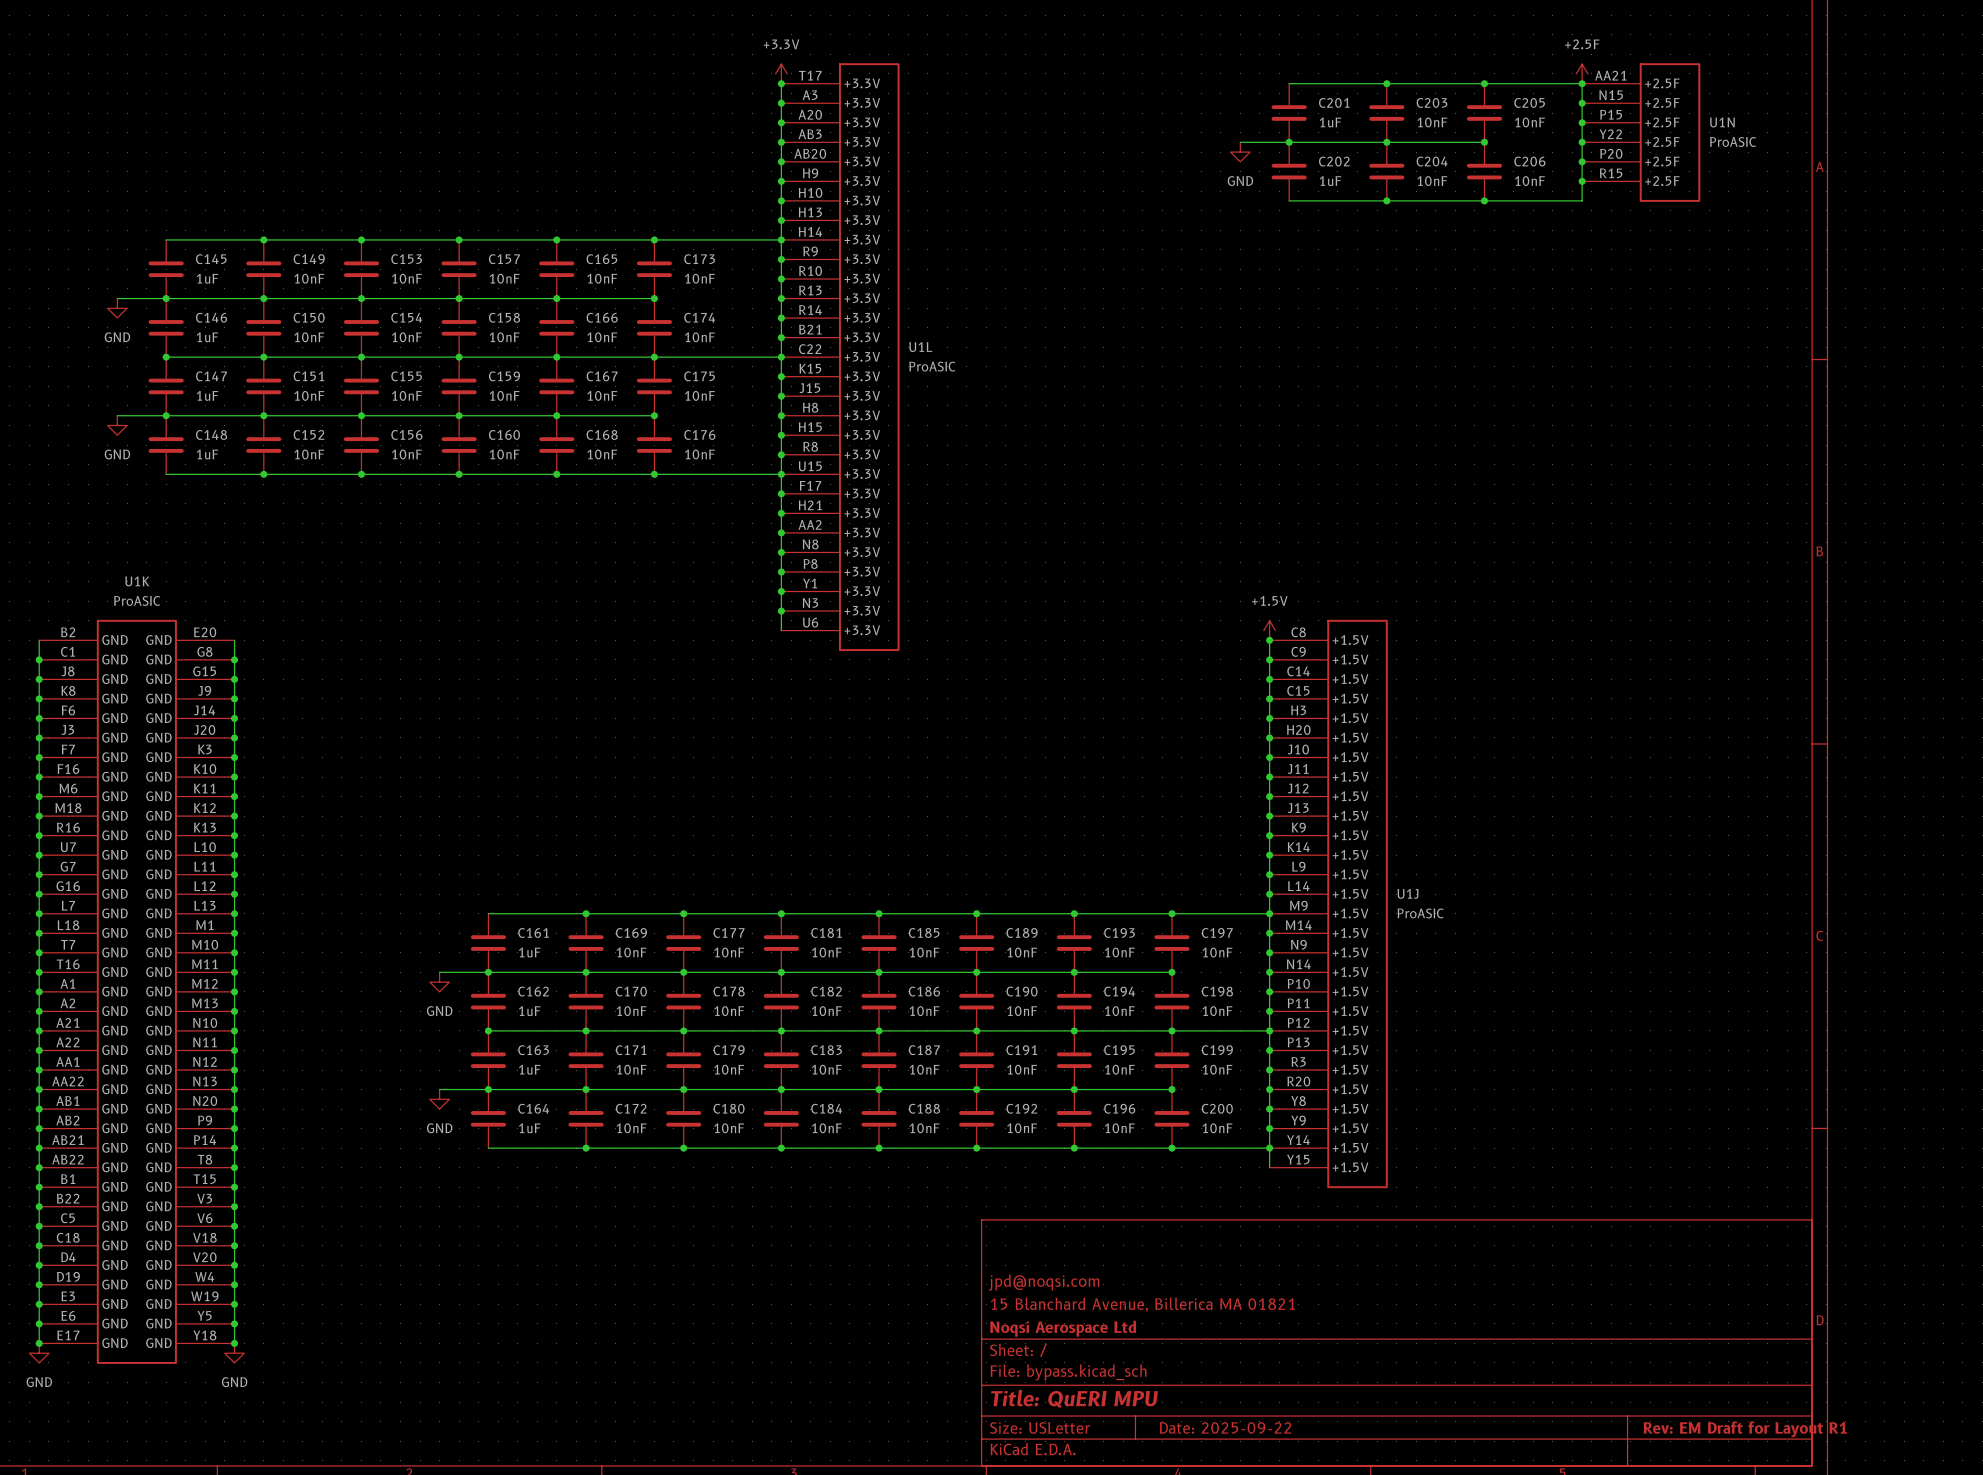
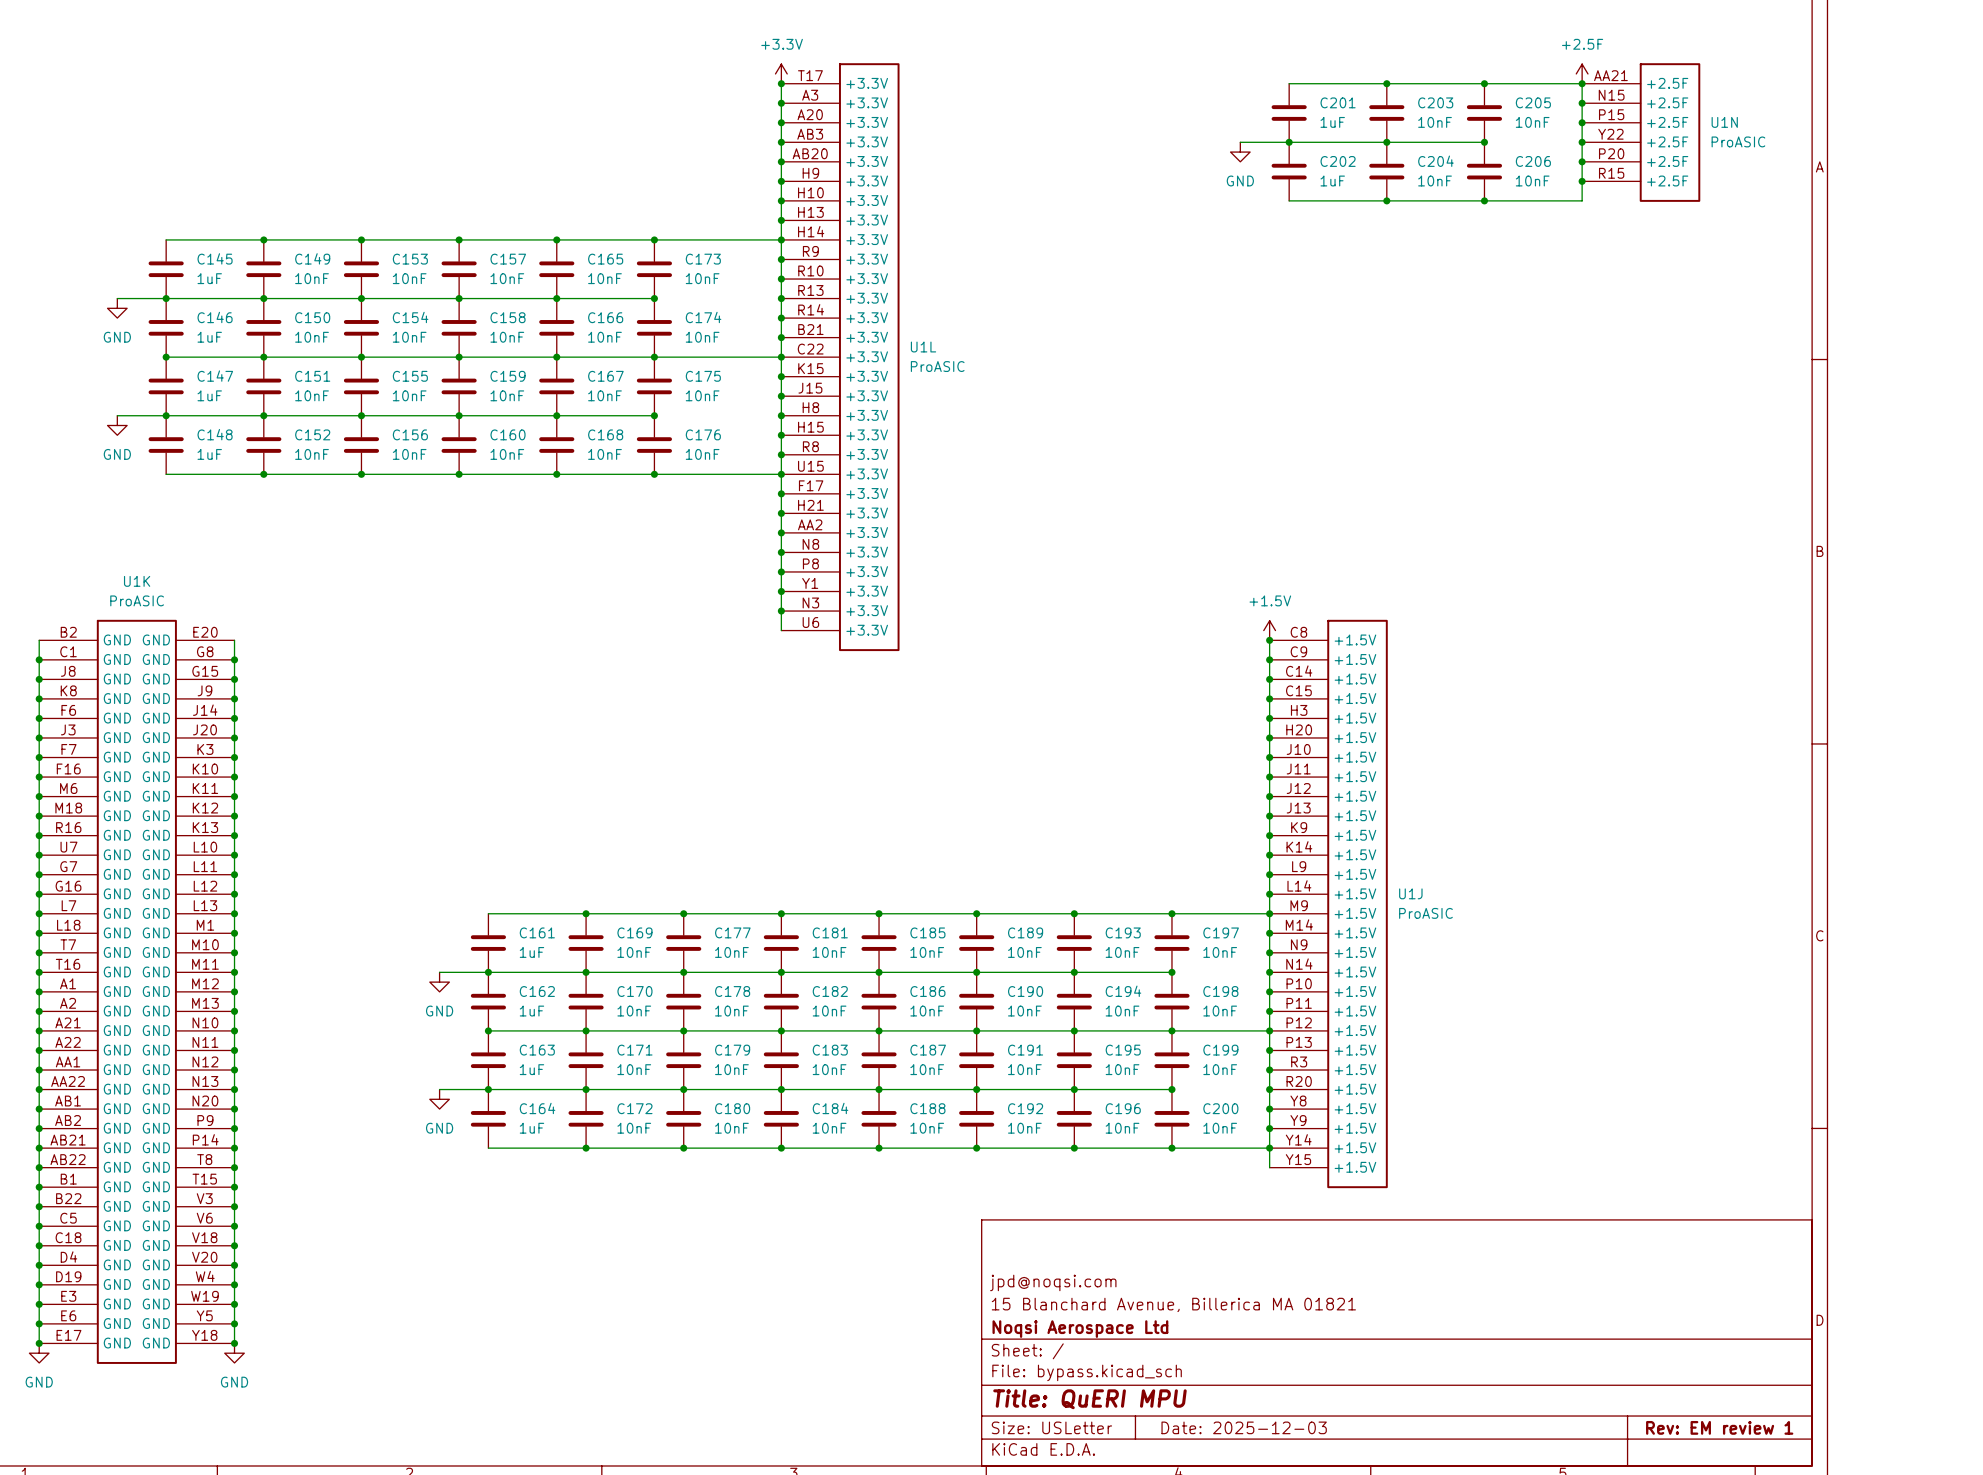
title block: Date: 2025-09-22 (1225, 1427) -> Date: 2025-12-03 (1244, 1427)
title block: Rev: EM Draft for Layout R1 (1745, 1429) -> Rev: EM review 1 (1719, 1427)

